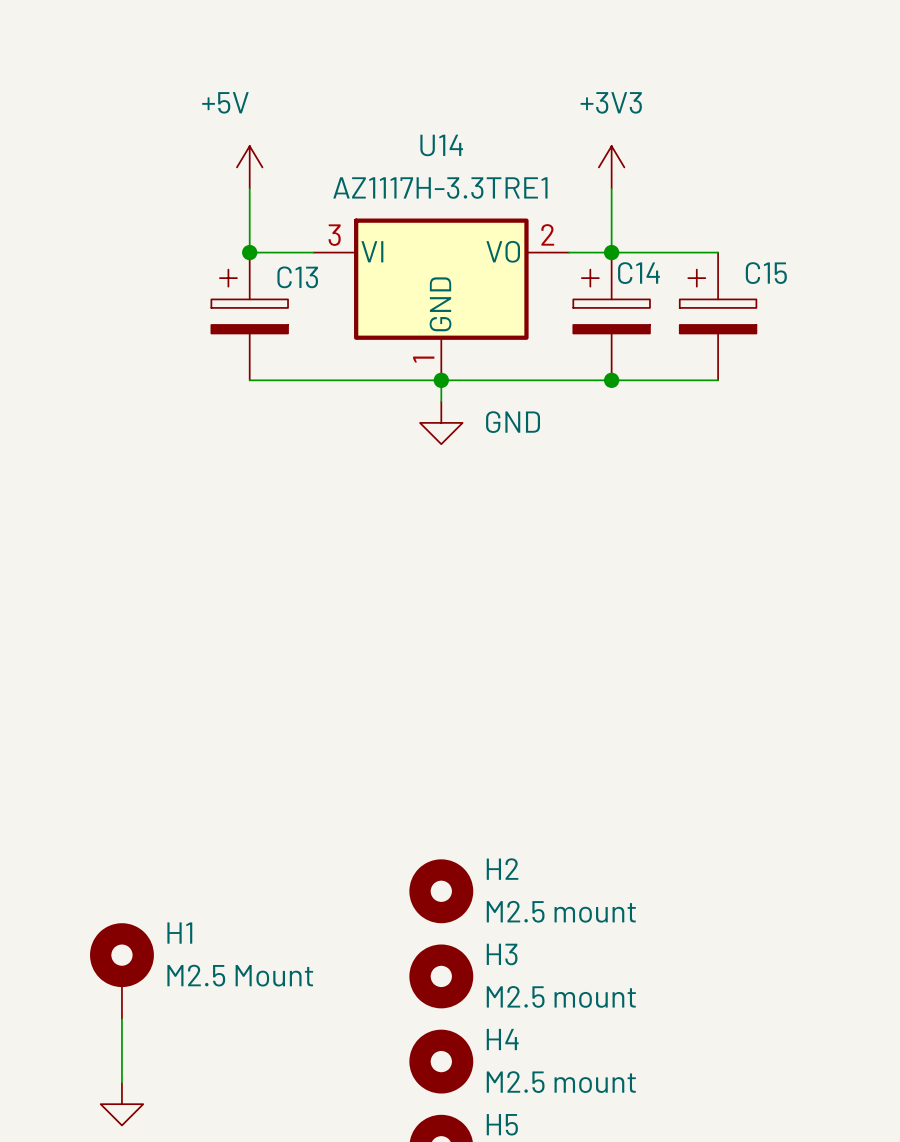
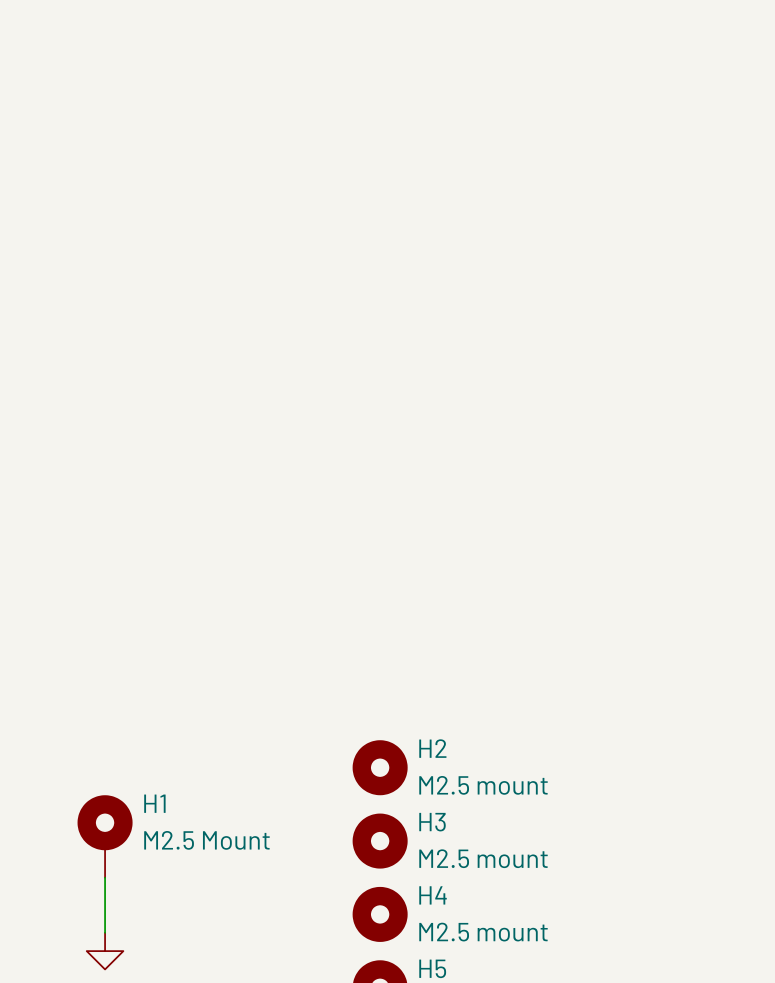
power symbol: +5V (249, 167) -> none
power symbol: +3V3 (611, 167) -> none
wire: (249, 188) (249, 252) (313, 252) -> none
wire: (611, 188) (611, 252) -> none
junction: (249, 252) -> none
wire: (569, 252) (718, 252) -> none
junction: (611, 252) -> none
U14: AZ1117H-3.3TRE1 (441, 299) -> none
C13: (249, 316) -> none
C14: (611, 316) -> none
C15: (718, 316) -> none
wire: (249, 380) (718, 380) -> none
wire: (441, 380) (441, 401) -> none
junction: (441, 380) -> none
junction: (611, 380) -> none
power symbol: GND (441, 422) -> none

